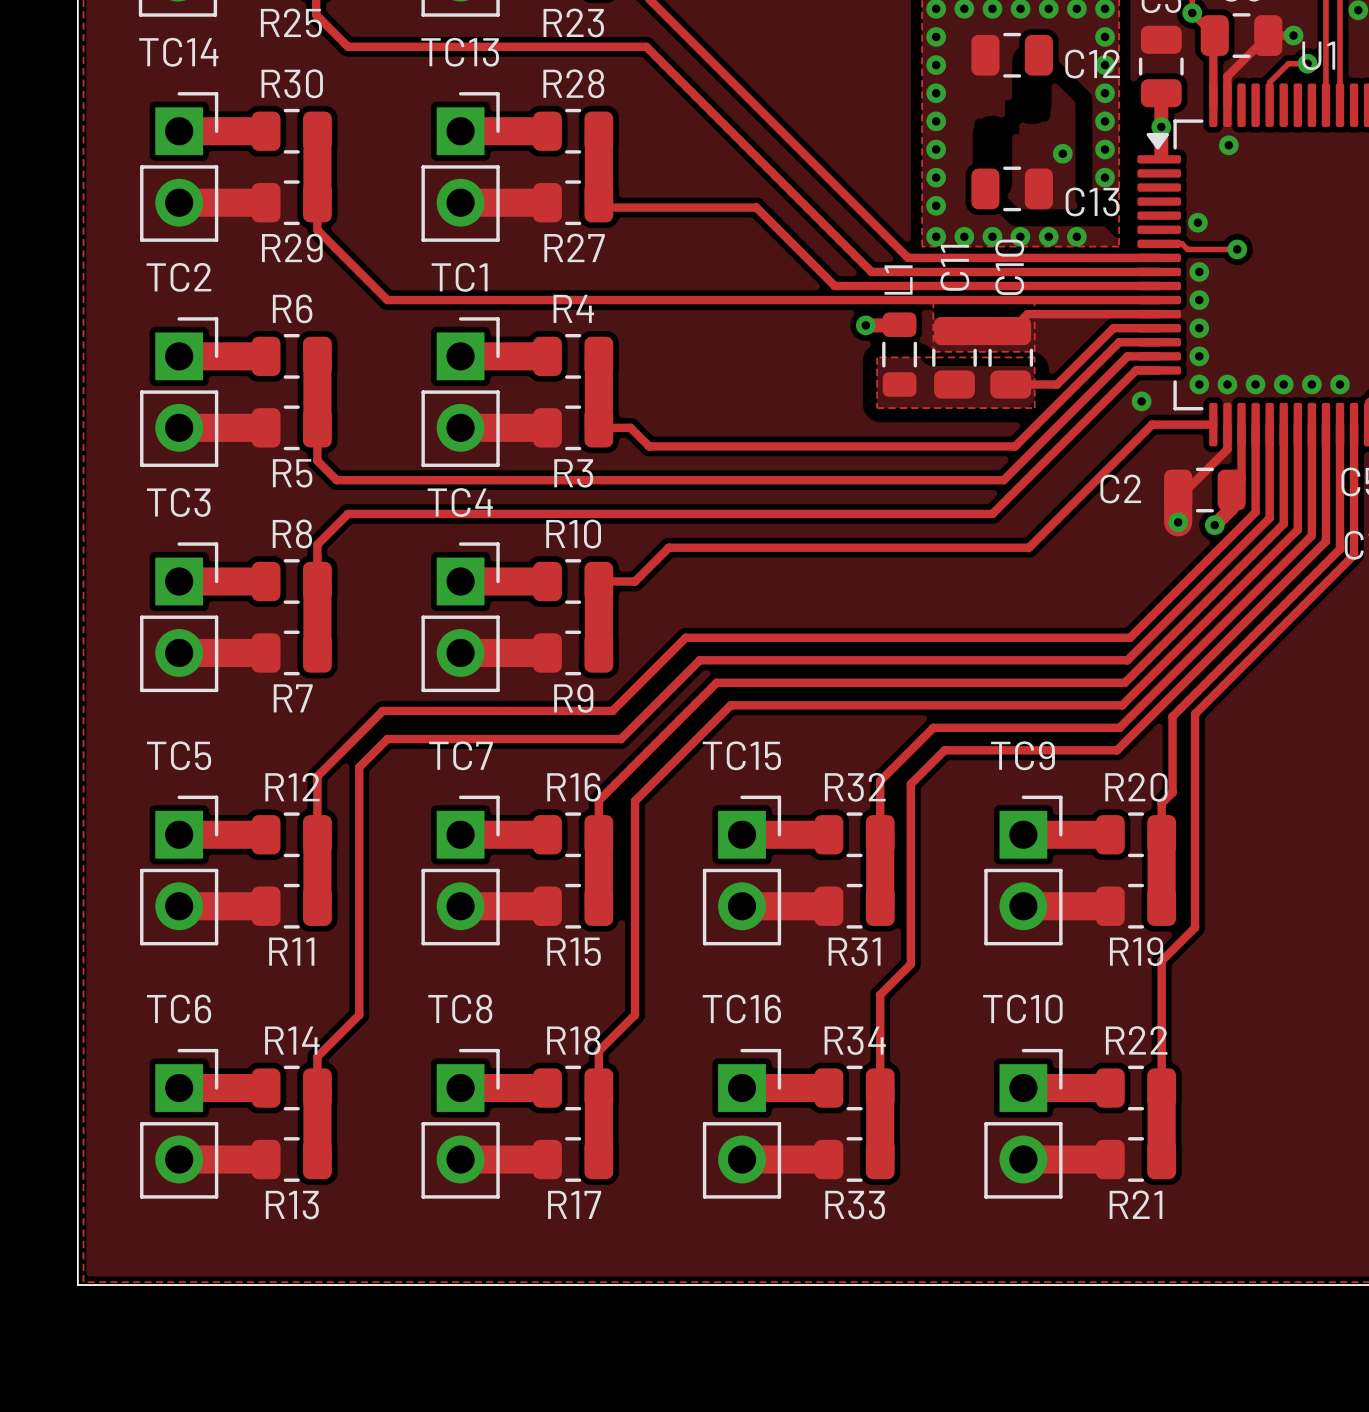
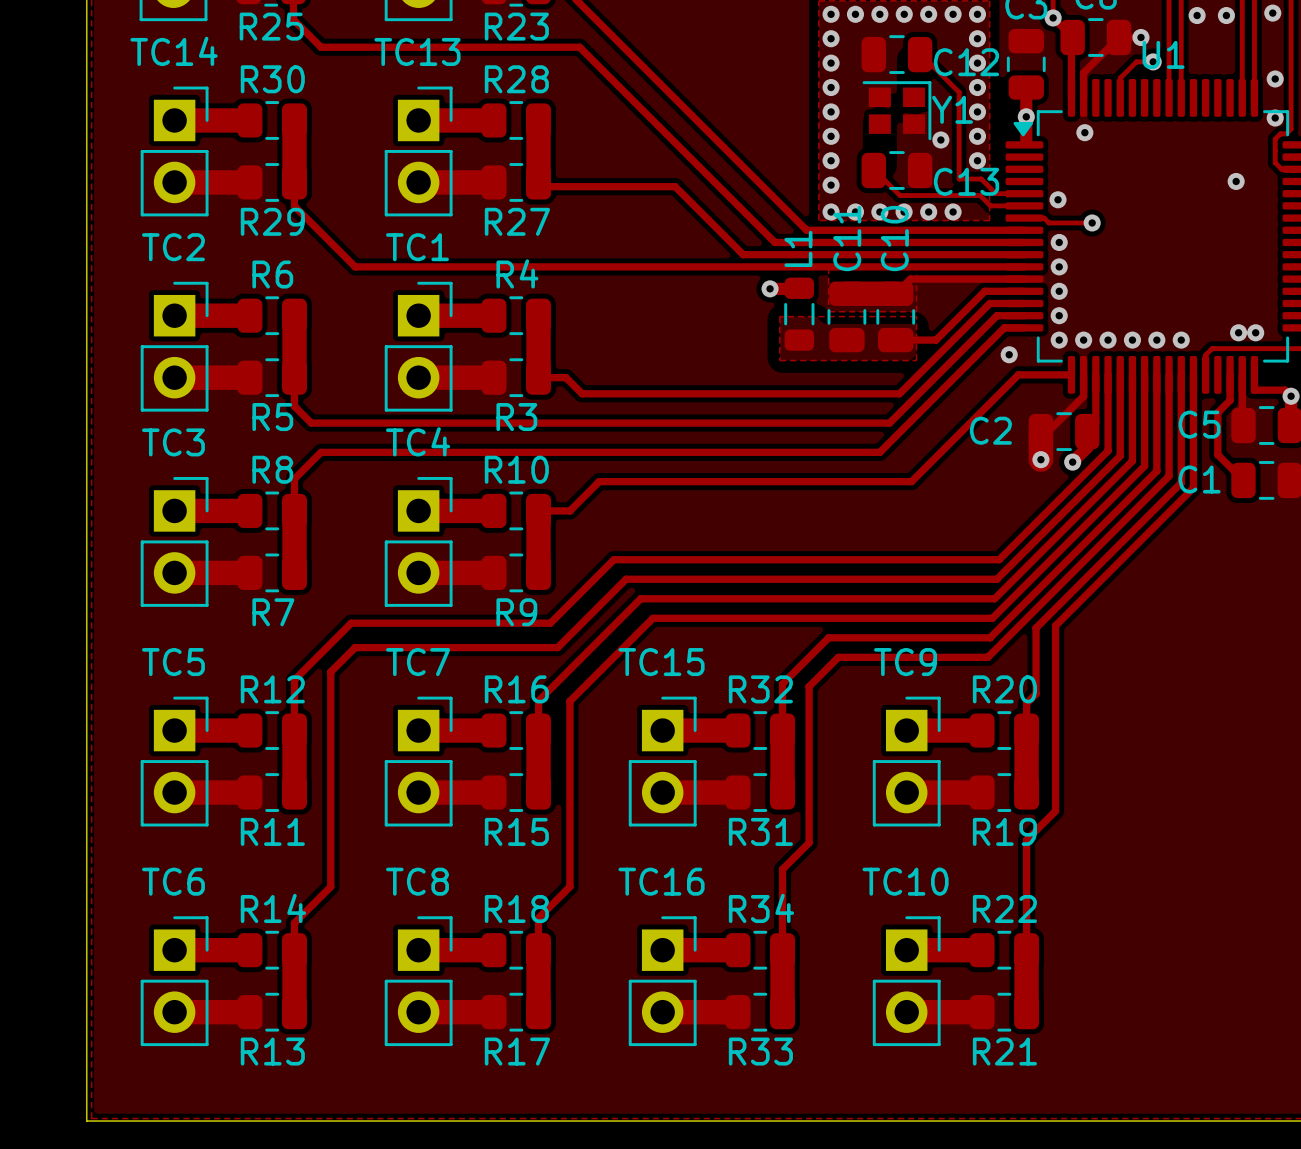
track: none -> (920, 53) (959, 92) (959, 179) (981, 179) (995, 193) (1024, 193)
Y1: none -> (896, 110)
track: none -> (873, 169) (900, 195) (980, 195) (990, 205) (1024, 205)

